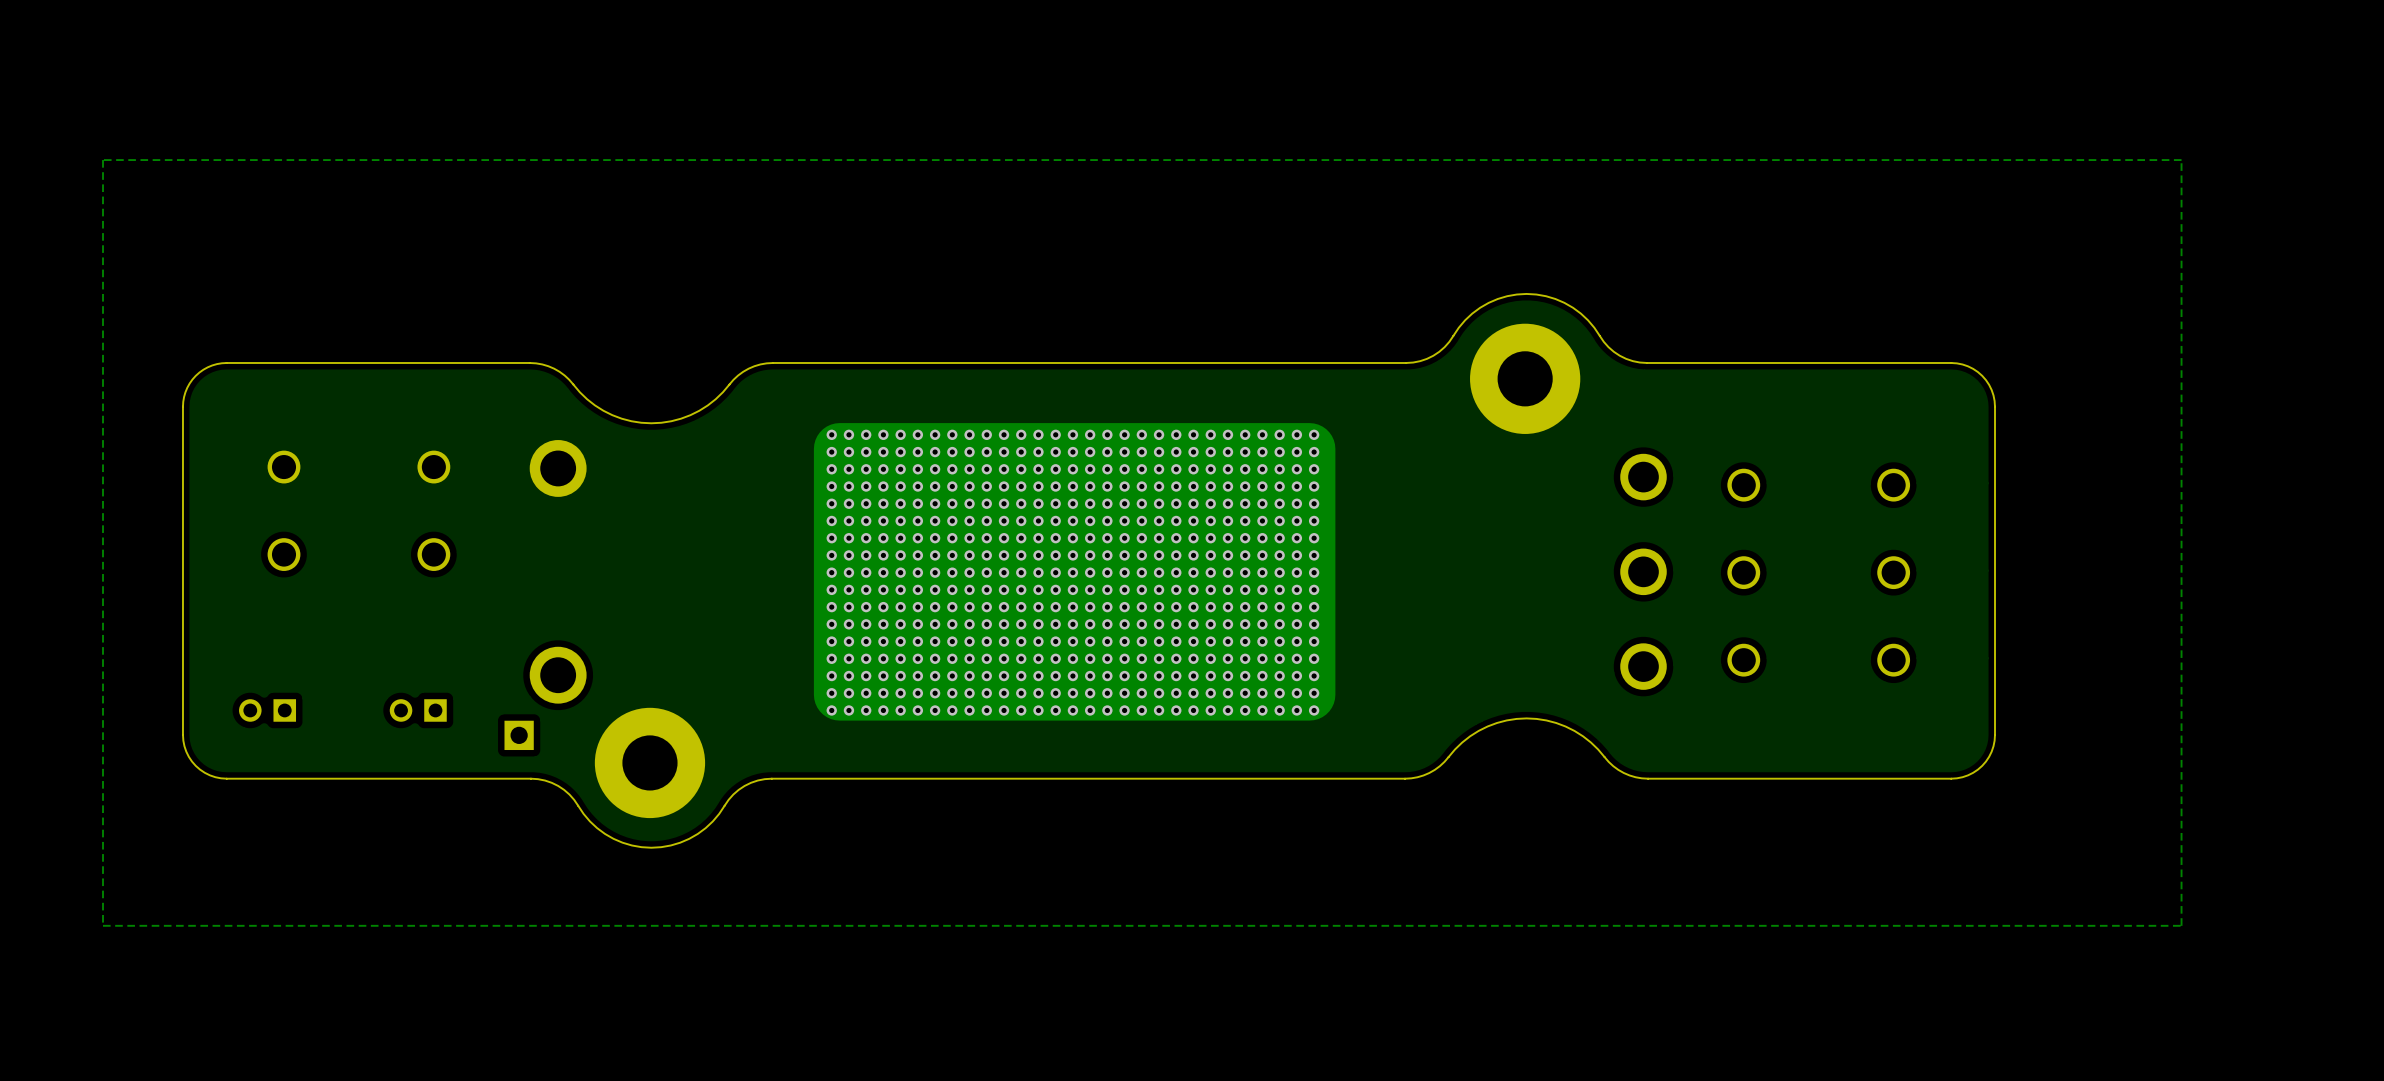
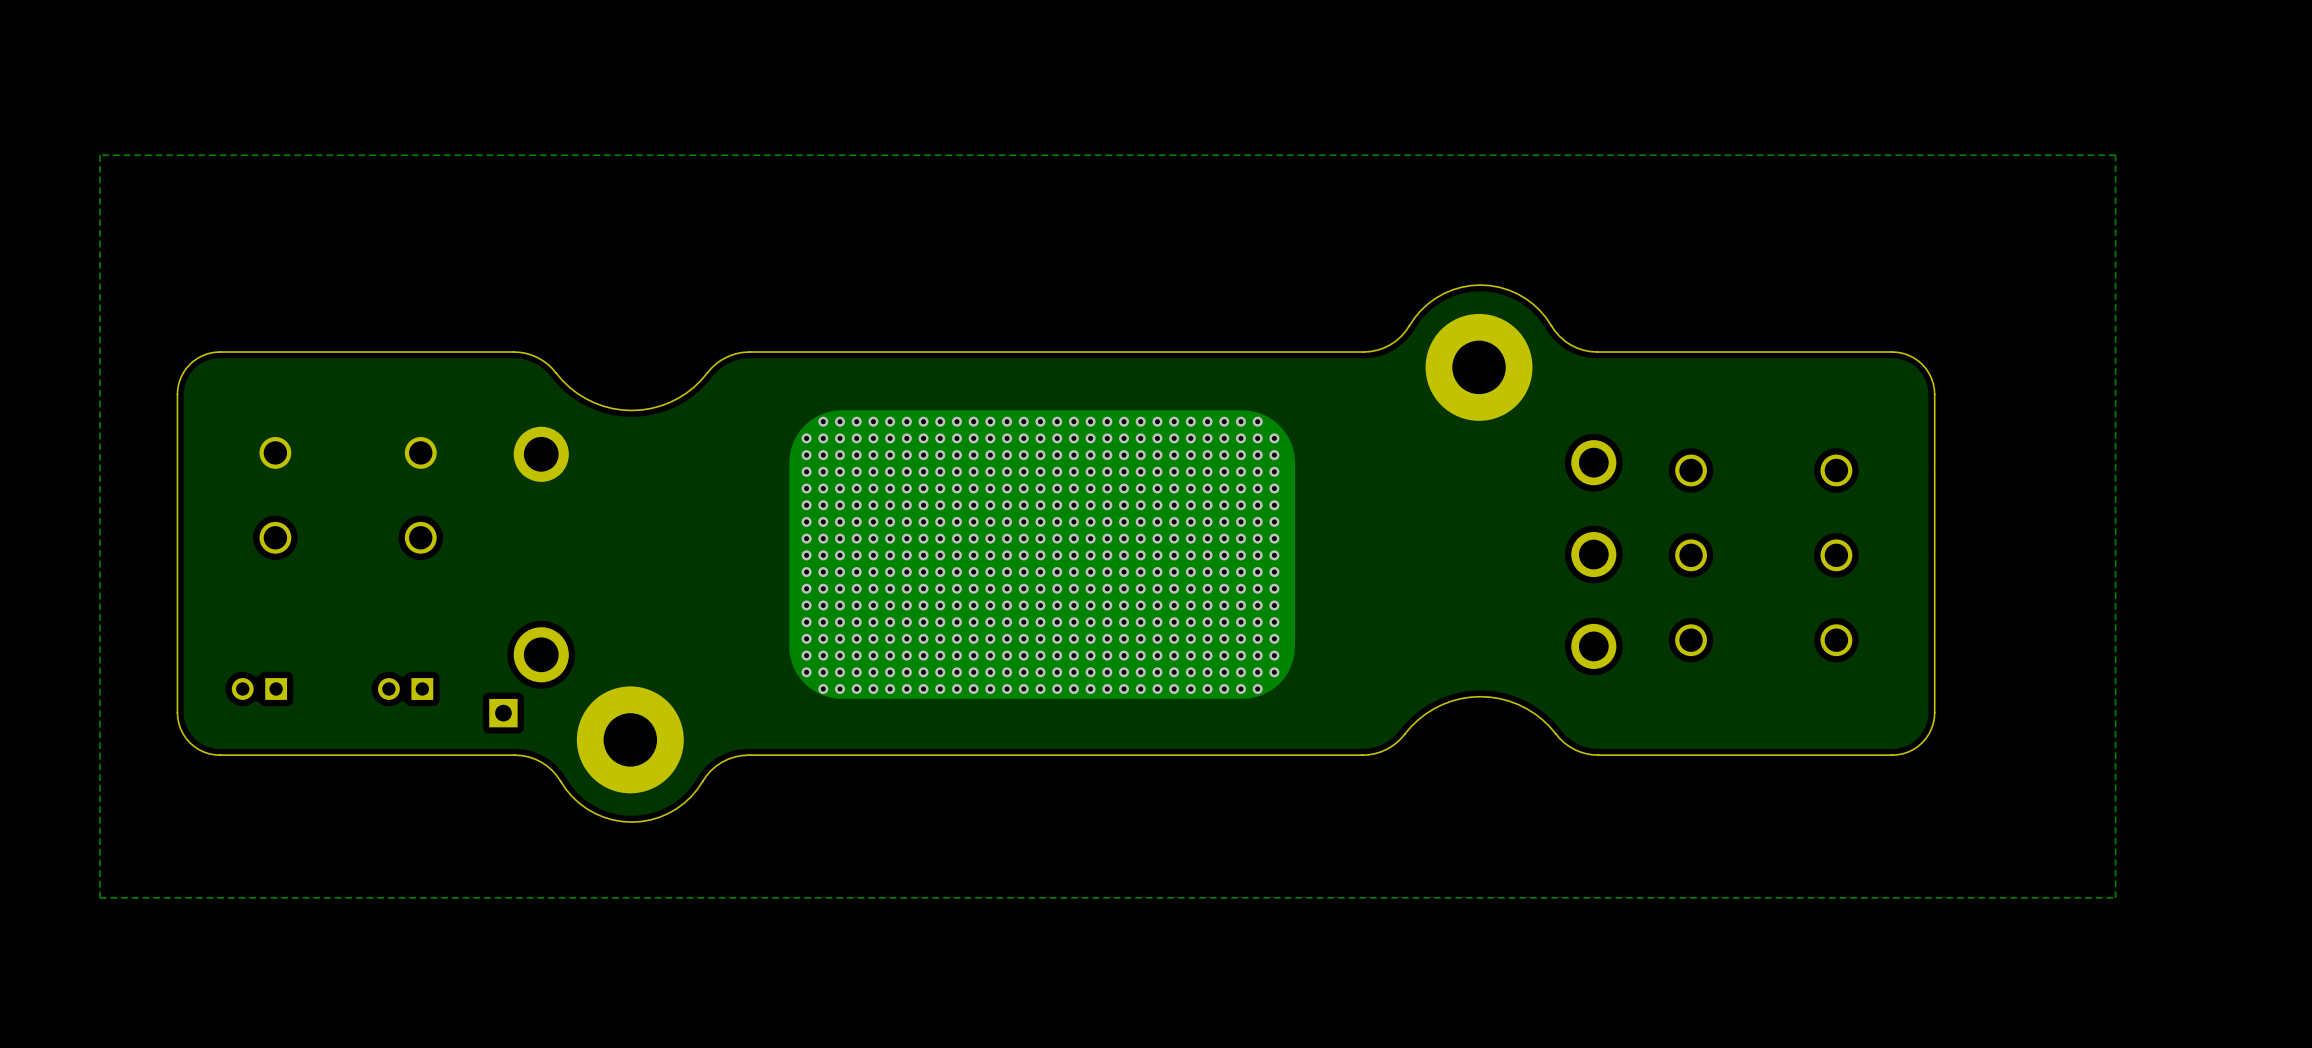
part footprint: [813, 423, 1336, 721] -> [789, 410, 1296, 699]
via: (831, 434) -> none
via: (1314, 434) -> none
via: (831, 710) -> none
via: (1314, 710) -> none

